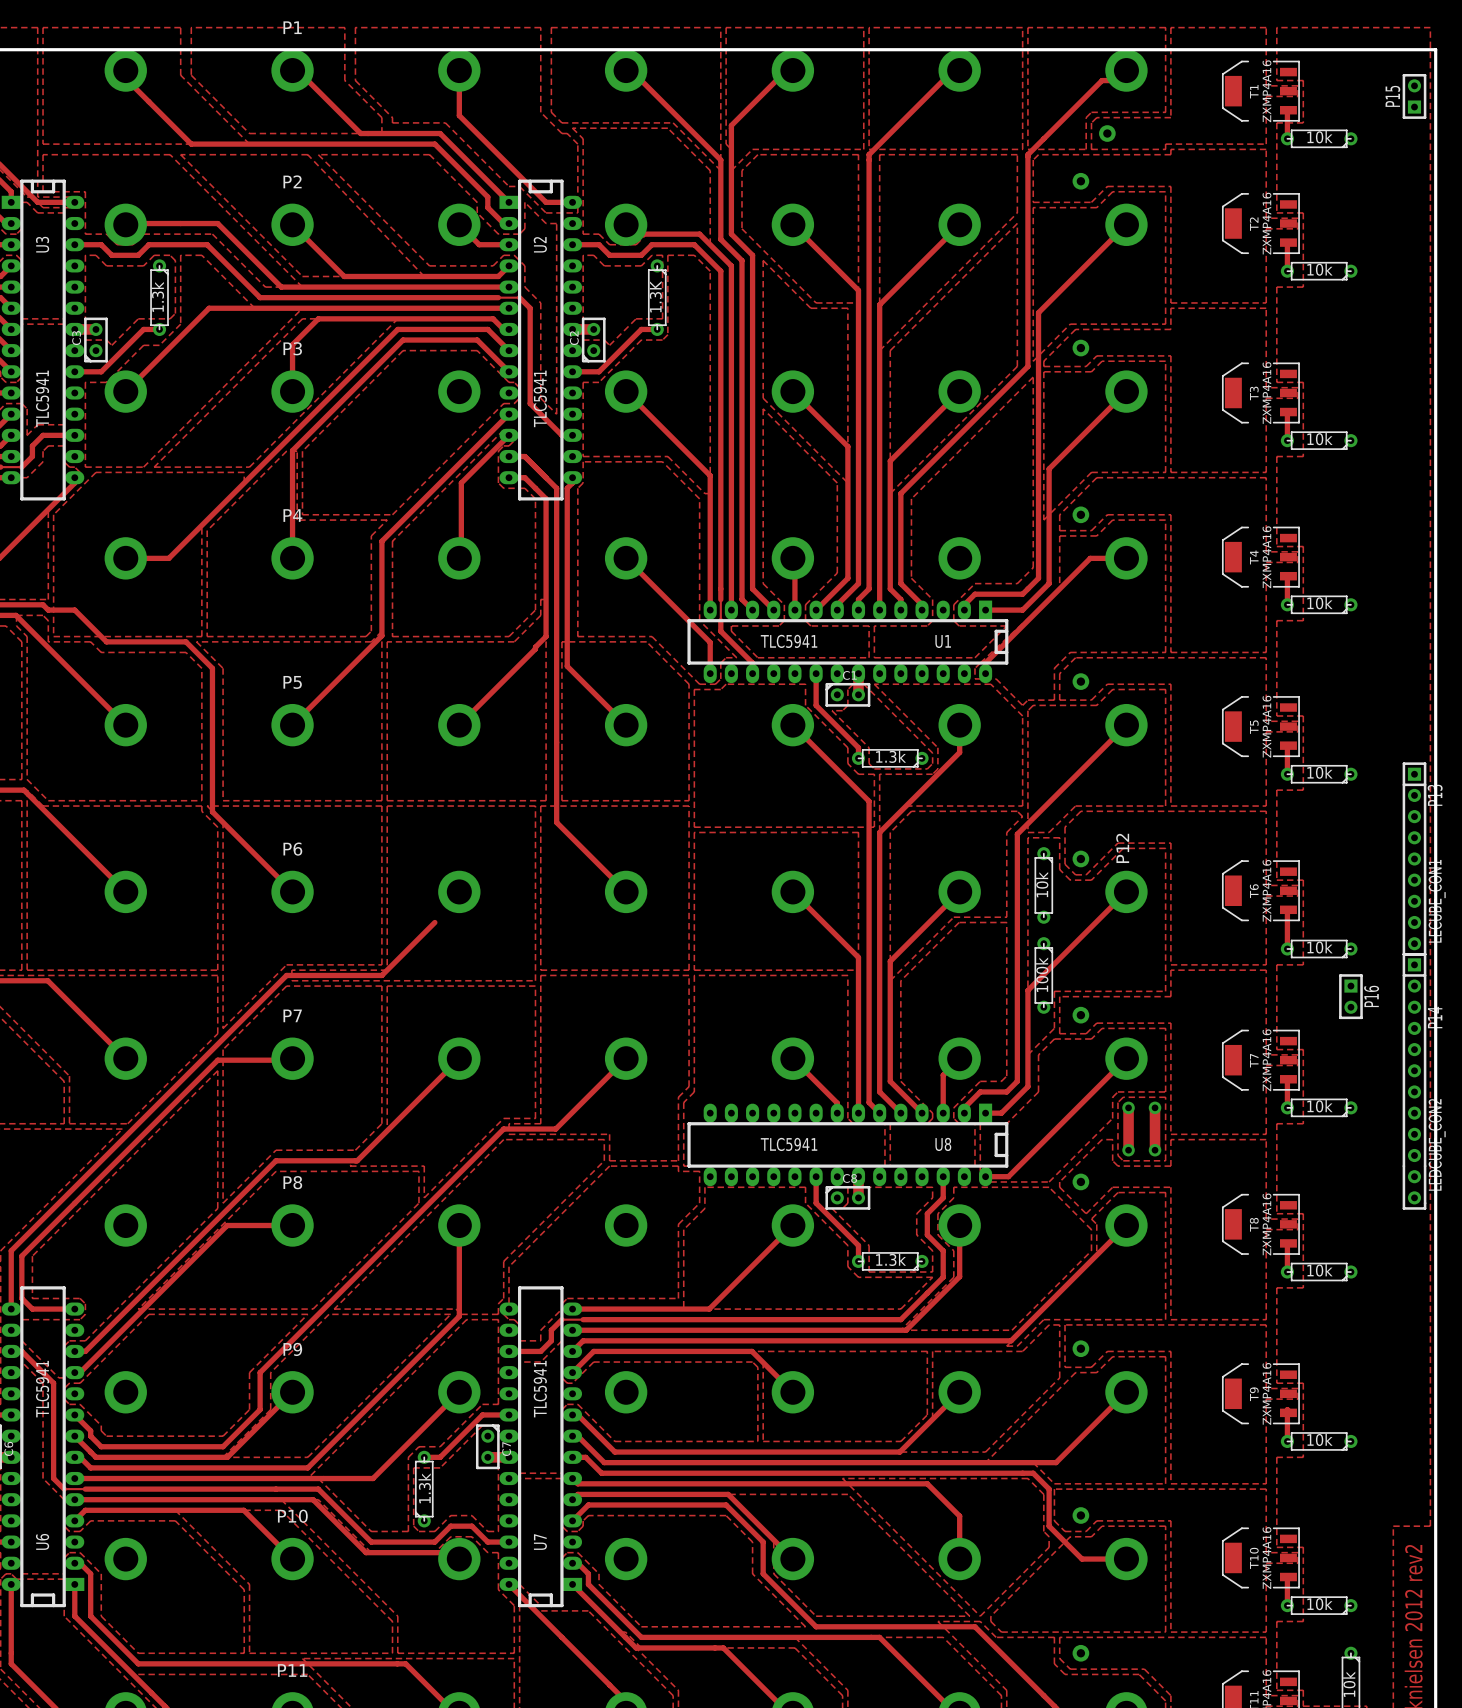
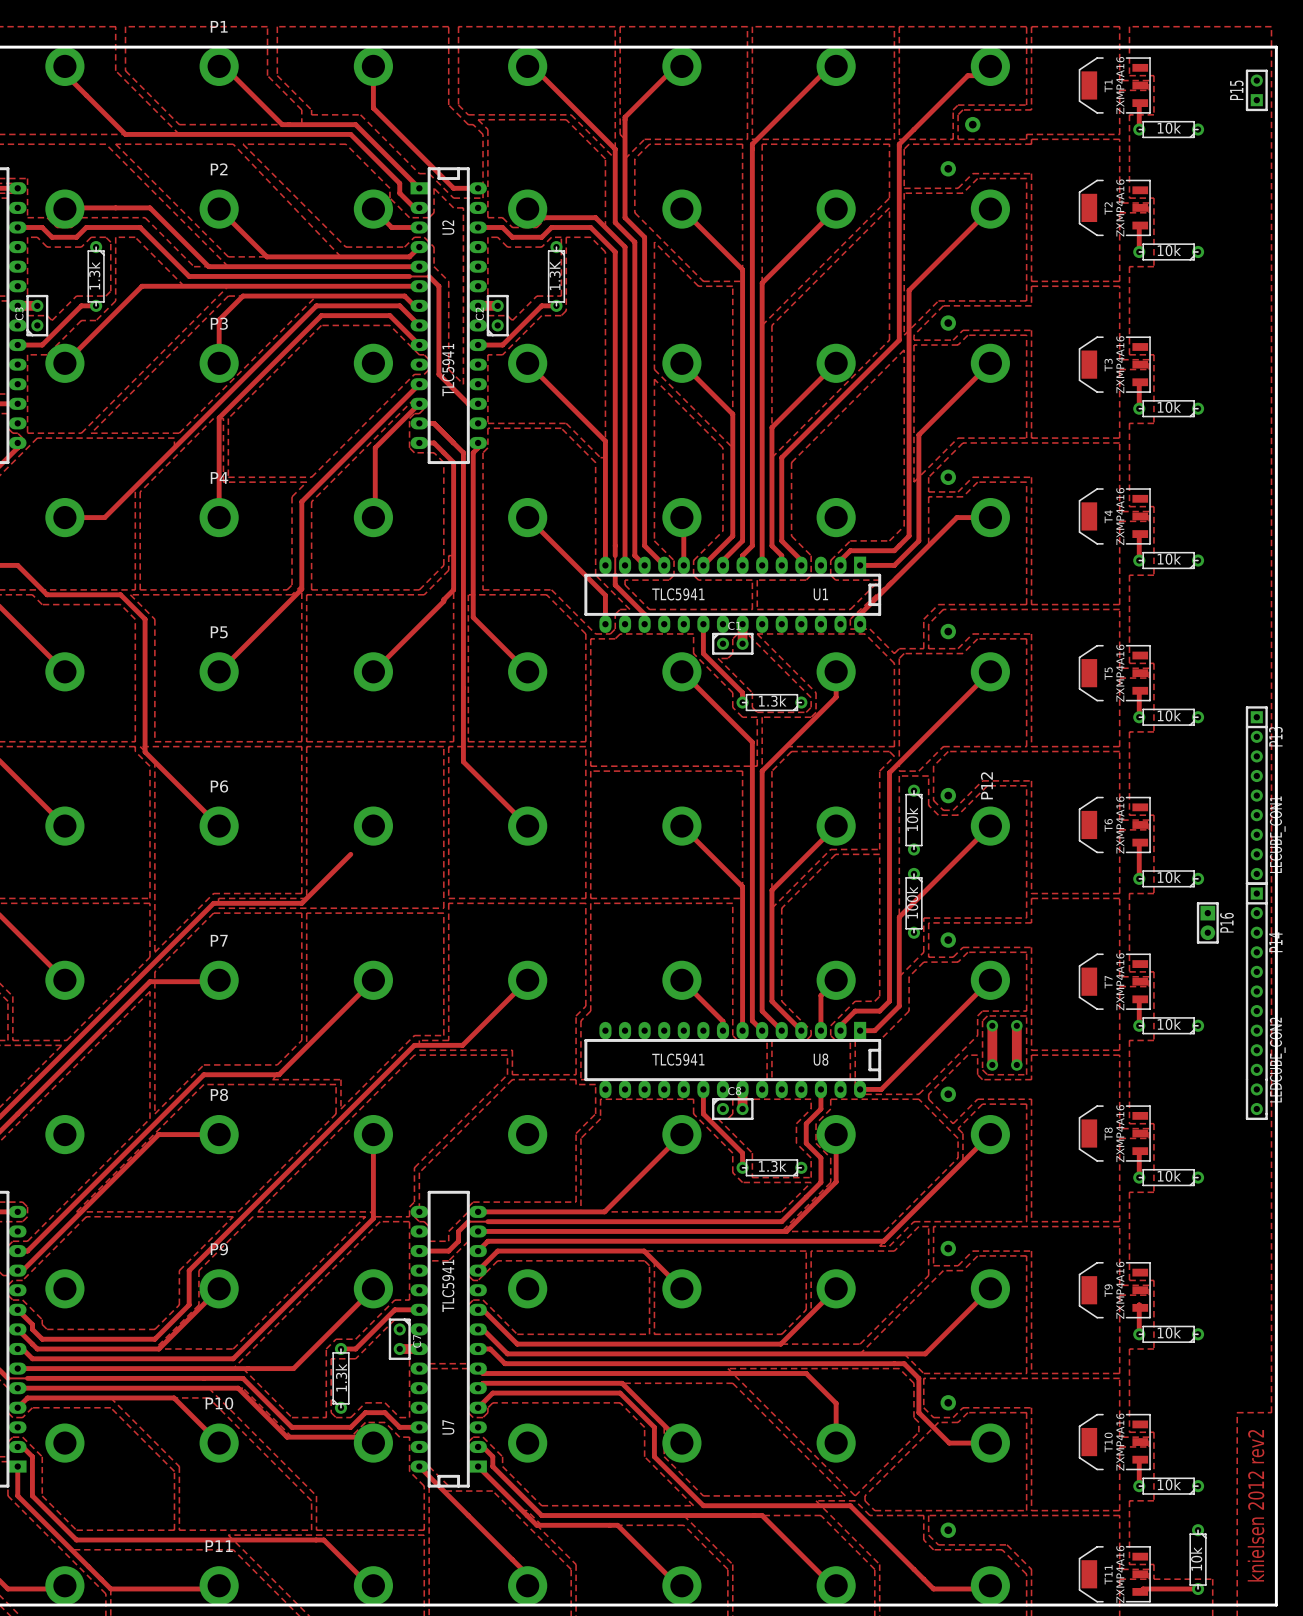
P16 footprint: [1339, 974, 1363, 1020] -> [1196, 902, 1219, 944]

